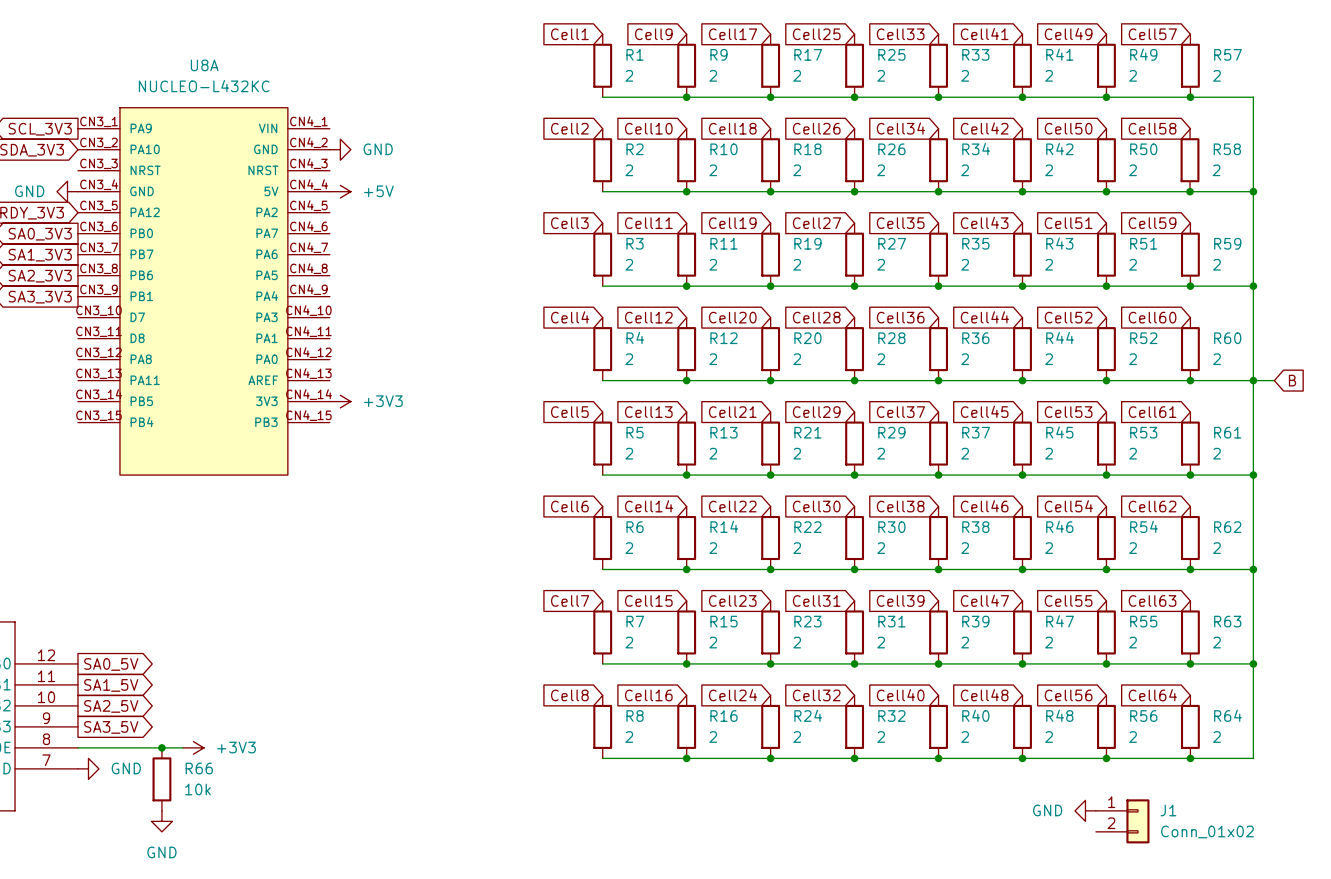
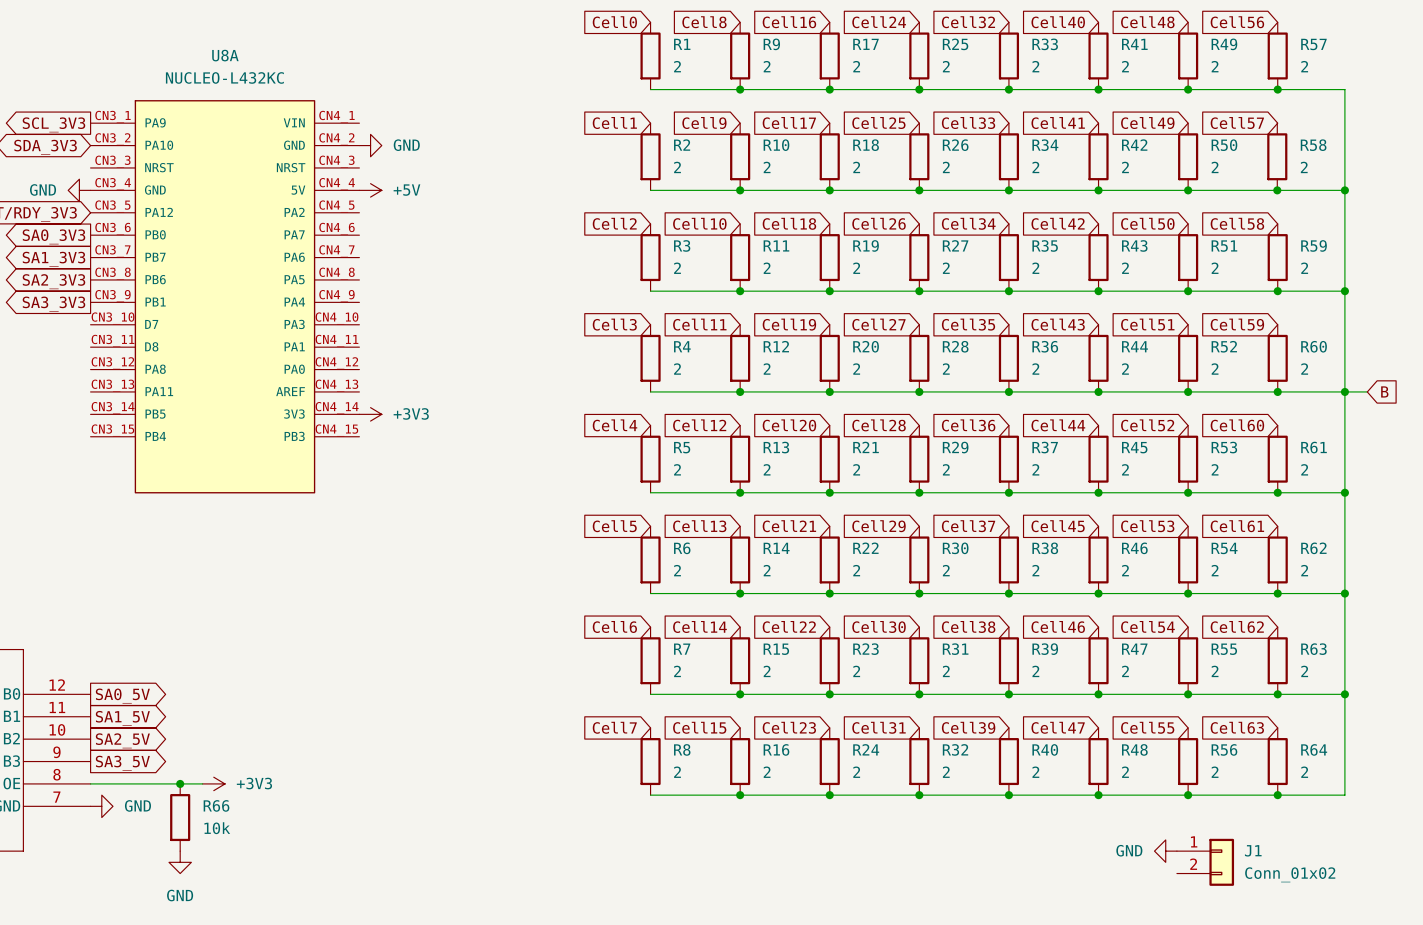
global label: Cell1 (569, 34) -> Cell0 (614, 22)
global label: Cell9 (653, 34) -> Cell8 (704, 22)
global label: Cell17 (733, 34) -> Cell16 (789, 22)
global label: Cell25 (816, 34) -> Cell24 (879, 22)
global label: Cell33 (900, 34) -> Cell32 (968, 22)
global label: Cell41 (984, 34) -> Cell40 (1058, 22)
global label: Cell49 (1068, 34) -> Cell48 (1147, 22)
global label: Cell57 (1152, 34) -> Cell56 (1237, 22)
global label: Cell2 (569, 128) -> Cell1 (614, 123)
global label: Cell10 (648, 128) -> Cell9 (704, 123)
global label: Cell18 (732, 128) -> Cell17 (789, 123)
global label: Cell26 (816, 128) -> Cell25 (878, 123)
global label: Cell34 (900, 128) -> Cell33 (968, 123)
global label: Cell42 (984, 128) -> Cell41 (1058, 123)
global label: Cell50 (1068, 128) -> Cell49 (1147, 123)
global label: Cell58 (1152, 128) -> Cell57 (1237, 123)
global label: Cell43 (984, 222) -> Cell42 (1058, 223)
global label: Cell3 (569, 223) -> Cell2 (614, 223)
global label: Cell11 (648, 223) -> Cell10 (699, 223)
global label: Cell19 (732, 223) -> Cell18 (789, 223)
global label: Cell27 (816, 223) -> Cell26 (879, 223)
global label: Cell35 (900, 223) -> Cell34 (968, 223)
global label: Cell51 (1068, 223) -> Cell50 (1147, 223)
global label: Cell59 (1152, 223) -> Cell58 (1237, 223)
global label: Cell4 (570, 317) -> Cell3 (614, 324)
global label: Cell12 (648, 317) -> Cell11 (699, 324)
global label: Cell20 (732, 317) -> Cell19 (789, 324)
global label: Cell28 (816, 317) -> Cell27 (878, 324)
global label: Cell36 (900, 317) -> Cell35 (968, 324)
global label: Cell44 (984, 317) -> Cell43 (1058, 324)
global label: Cell52 (1068, 317) -> Cell51 (1147, 324)
global label: Cell60 (1152, 317) -> Cell59 (1237, 324)
global label: Cell45 (984, 411) -> Cell44 (1058, 425)
global label: Cell5 (569, 412) -> Cell4 (614, 425)
global label: Cell13 (648, 412) -> Cell12 (699, 425)
global label: Cell21 (732, 412) -> Cell20 (789, 425)
global label: Cell29 (816, 412) -> Cell28 (879, 425)
global label: Cell37 (900, 412) -> Cell36 (968, 425)
global label: Cell53 (1068, 412) -> Cell52 (1147, 425)
global label: Cell61 (1152, 412) -> Cell60 (1237, 425)
global label: Cell6 (569, 506) -> Cell5 (614, 526)
global label: Cell14 (649, 506) -> Cell13 (699, 526)
global label: Cell22 (732, 506) -> Cell21 (789, 526)
global label: Cell30 (816, 506) -> Cell29 (879, 526)
global label: Cell38 (900, 506) -> Cell37 (968, 526)
global label: Cell46 (984, 506) -> Cell45 (1058, 526)
global label: Cell54 (1068, 506) -> Cell53 (1147, 526)
global label: Cell62 (1152, 506) -> Cell61 (1237, 526)
global label: Cell7 (570, 600) -> Cell6 (614, 626)
global label: Cell15 (648, 600) -> Cell14 (699, 626)
global label: Cell23 (732, 600) -> Cell22 (789, 626)
global label: Cell31 (816, 600) -> Cell30 (879, 626)
global label: Cell39 (900, 600) -> Cell38 (968, 626)
global label: Cell47 (984, 600) -> Cell46 (1058, 626)
global label: Cell55 (1068, 600) -> Cell54 (1147, 626)
global label: Cell63 (1152, 600) -> Cell62 (1237, 626)
global label: Cell8 (569, 695) -> Cell7 (614, 727)
global label: Cell16 (648, 695) -> Cell15 (699, 727)
global label: Cell24 (733, 695) -> Cell23 (789, 727)
global label: Cell32 (816, 695) -> Cell31 (879, 727)
global label: Cell40 (900, 695) -> Cell39 (968, 727)
global label: Cell48 (984, 695) -> Cell47 (1058, 727)
global label: Cell56 (1068, 695) -> Cell55 (1147, 727)
global label: Cell64 (1152, 695) -> Cell63 (1237, 727)

